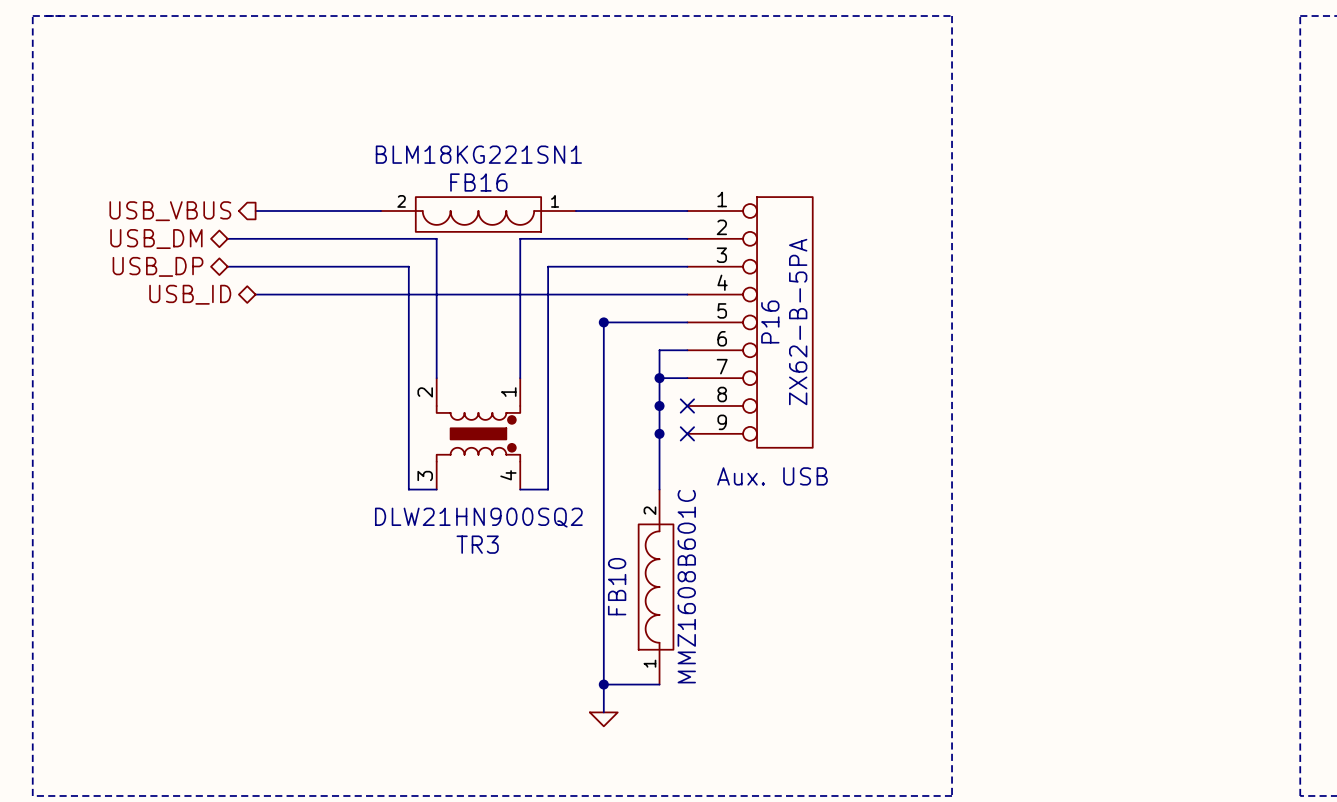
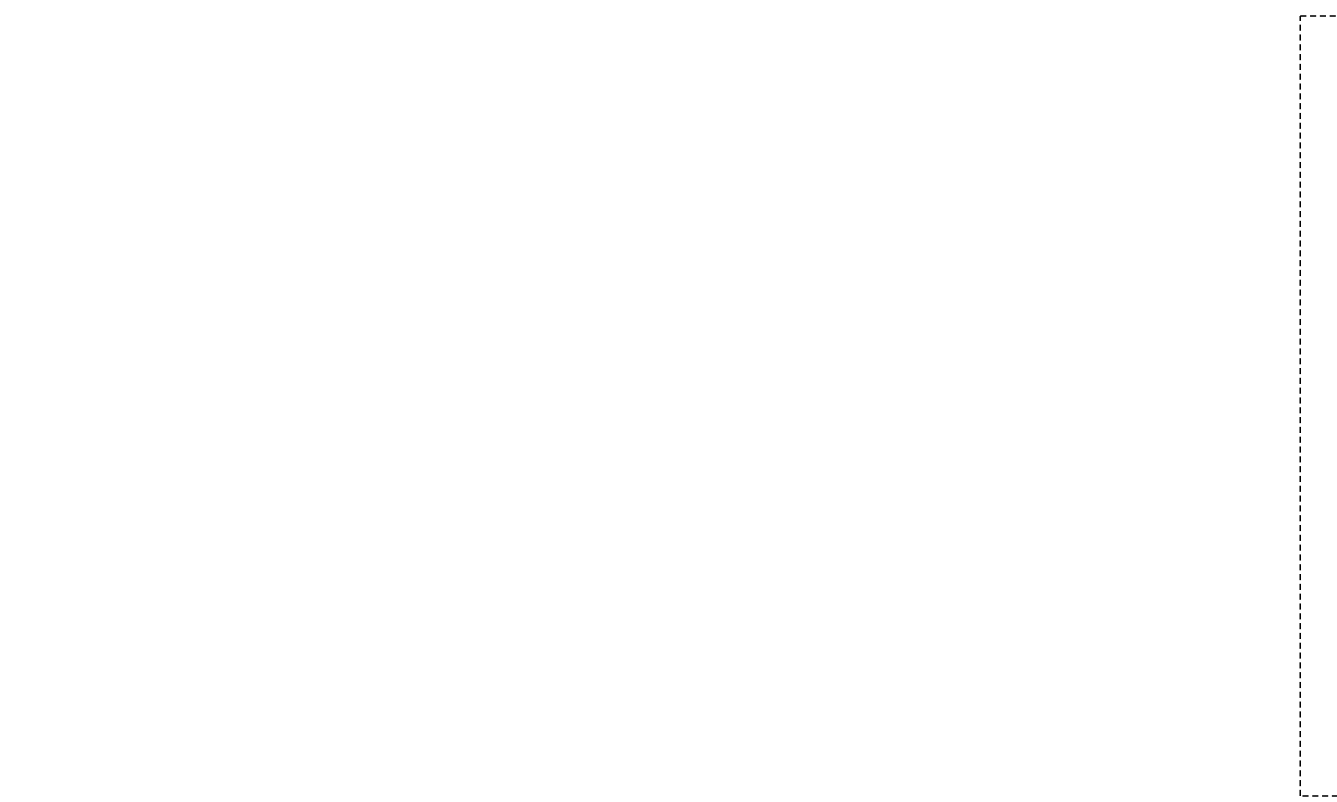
line: (32, 16) (952, 16) (952, 795) (32, 795) (32, 16) -> none
wire: (255, 210) (380, 210) -> none
wire: (575, 210) (687, 210) -> none
hierarchical label: USB_VBUS (170, 211) -> none
FB16: BLM18KG221SN1 (478, 214) -> none
wire: (227, 238) (436, 238) (436, 378) -> none
wire: (687, 238) (520, 238) (520, 378) -> none
hierarchical label: USB_DM (156, 239) -> none
hierarchical label: USB_DP (158, 266) -> none
wire: (227, 266) (408, 266) (408, 489) (436, 489) -> none
wire: (687, 266) (548, 266) (548, 489) (520, 489) -> none
hierarchical label: USB_ID (190, 294) -> none
wire: (255, 294) (687, 294) -> none
junction: (603, 322) -> none
wire: (687, 322) (603, 322) (603, 712) -> none
P16: ZX62-B-5PA (750, 322) -> none
wire: (687, 350) (659, 350) (659, 489) -> none
wire: (659, 378) (687, 378) -> none
junction: (659, 378) -> none
junction: (659, 405) -> none
no-connect mark: (687, 405) -> none
TR3: DLW21HN900SQ2 (478, 433) -> none
junction: (659, 433) -> none
no-connect mark: (687, 433) -> none
text: Aux. USB (772, 476) -> none
FB10: MMZ1608B601C (656, 587) -> none
wire: (603, 684) (659, 684) -> none
junction: (603, 684) -> none
power symbol: (603, 719) -> none

